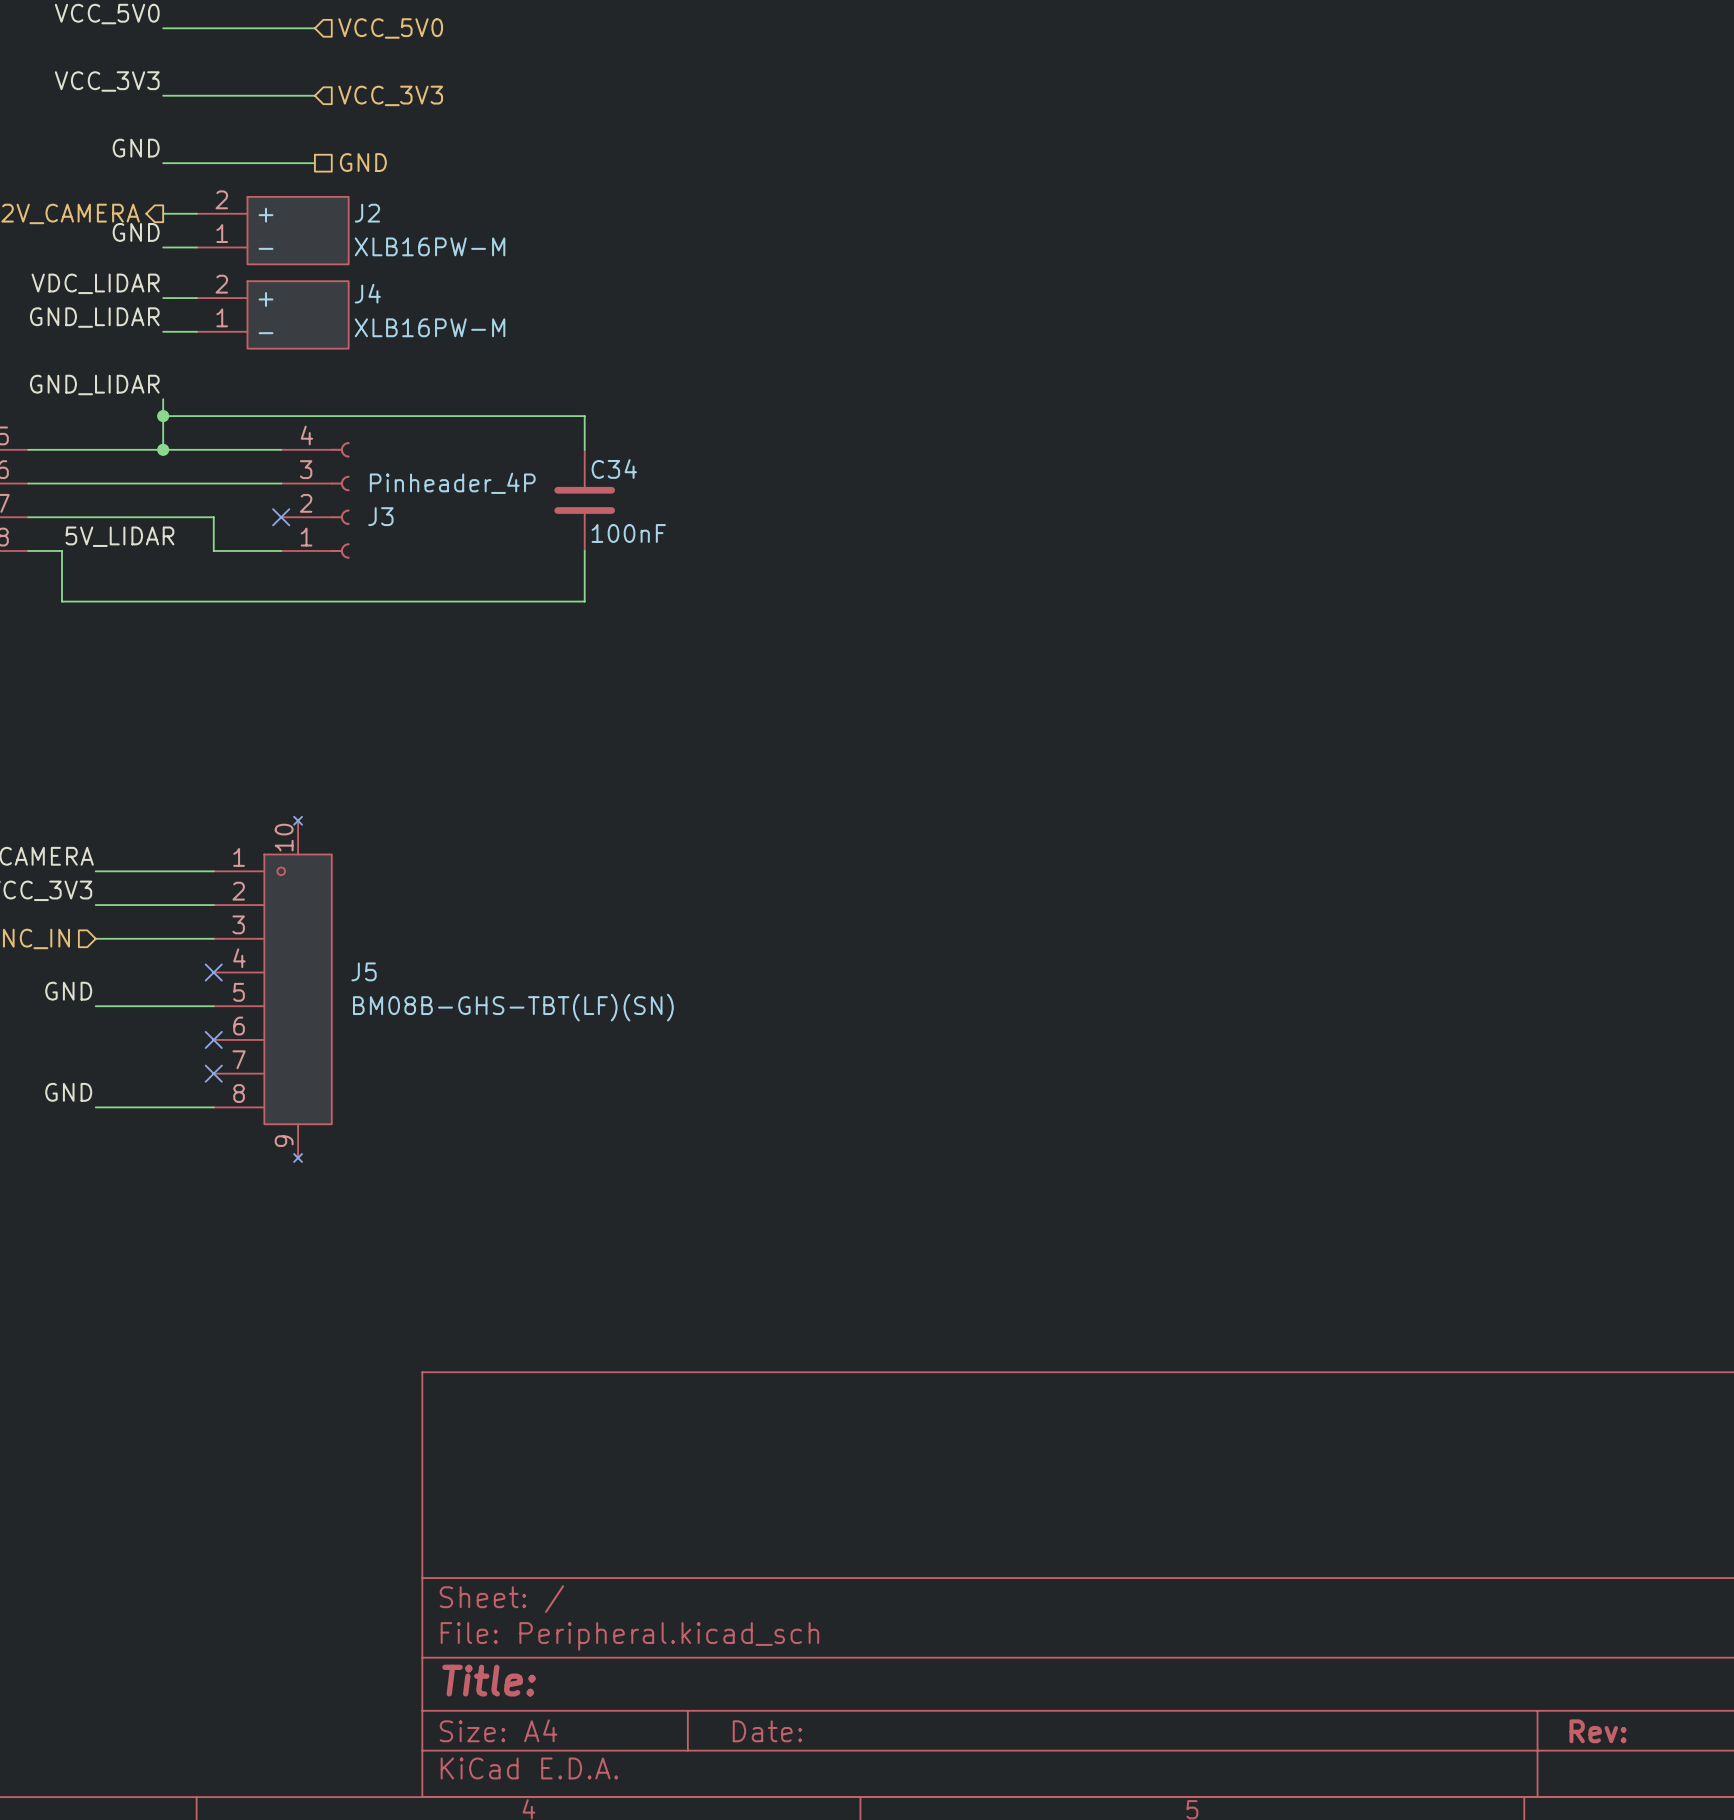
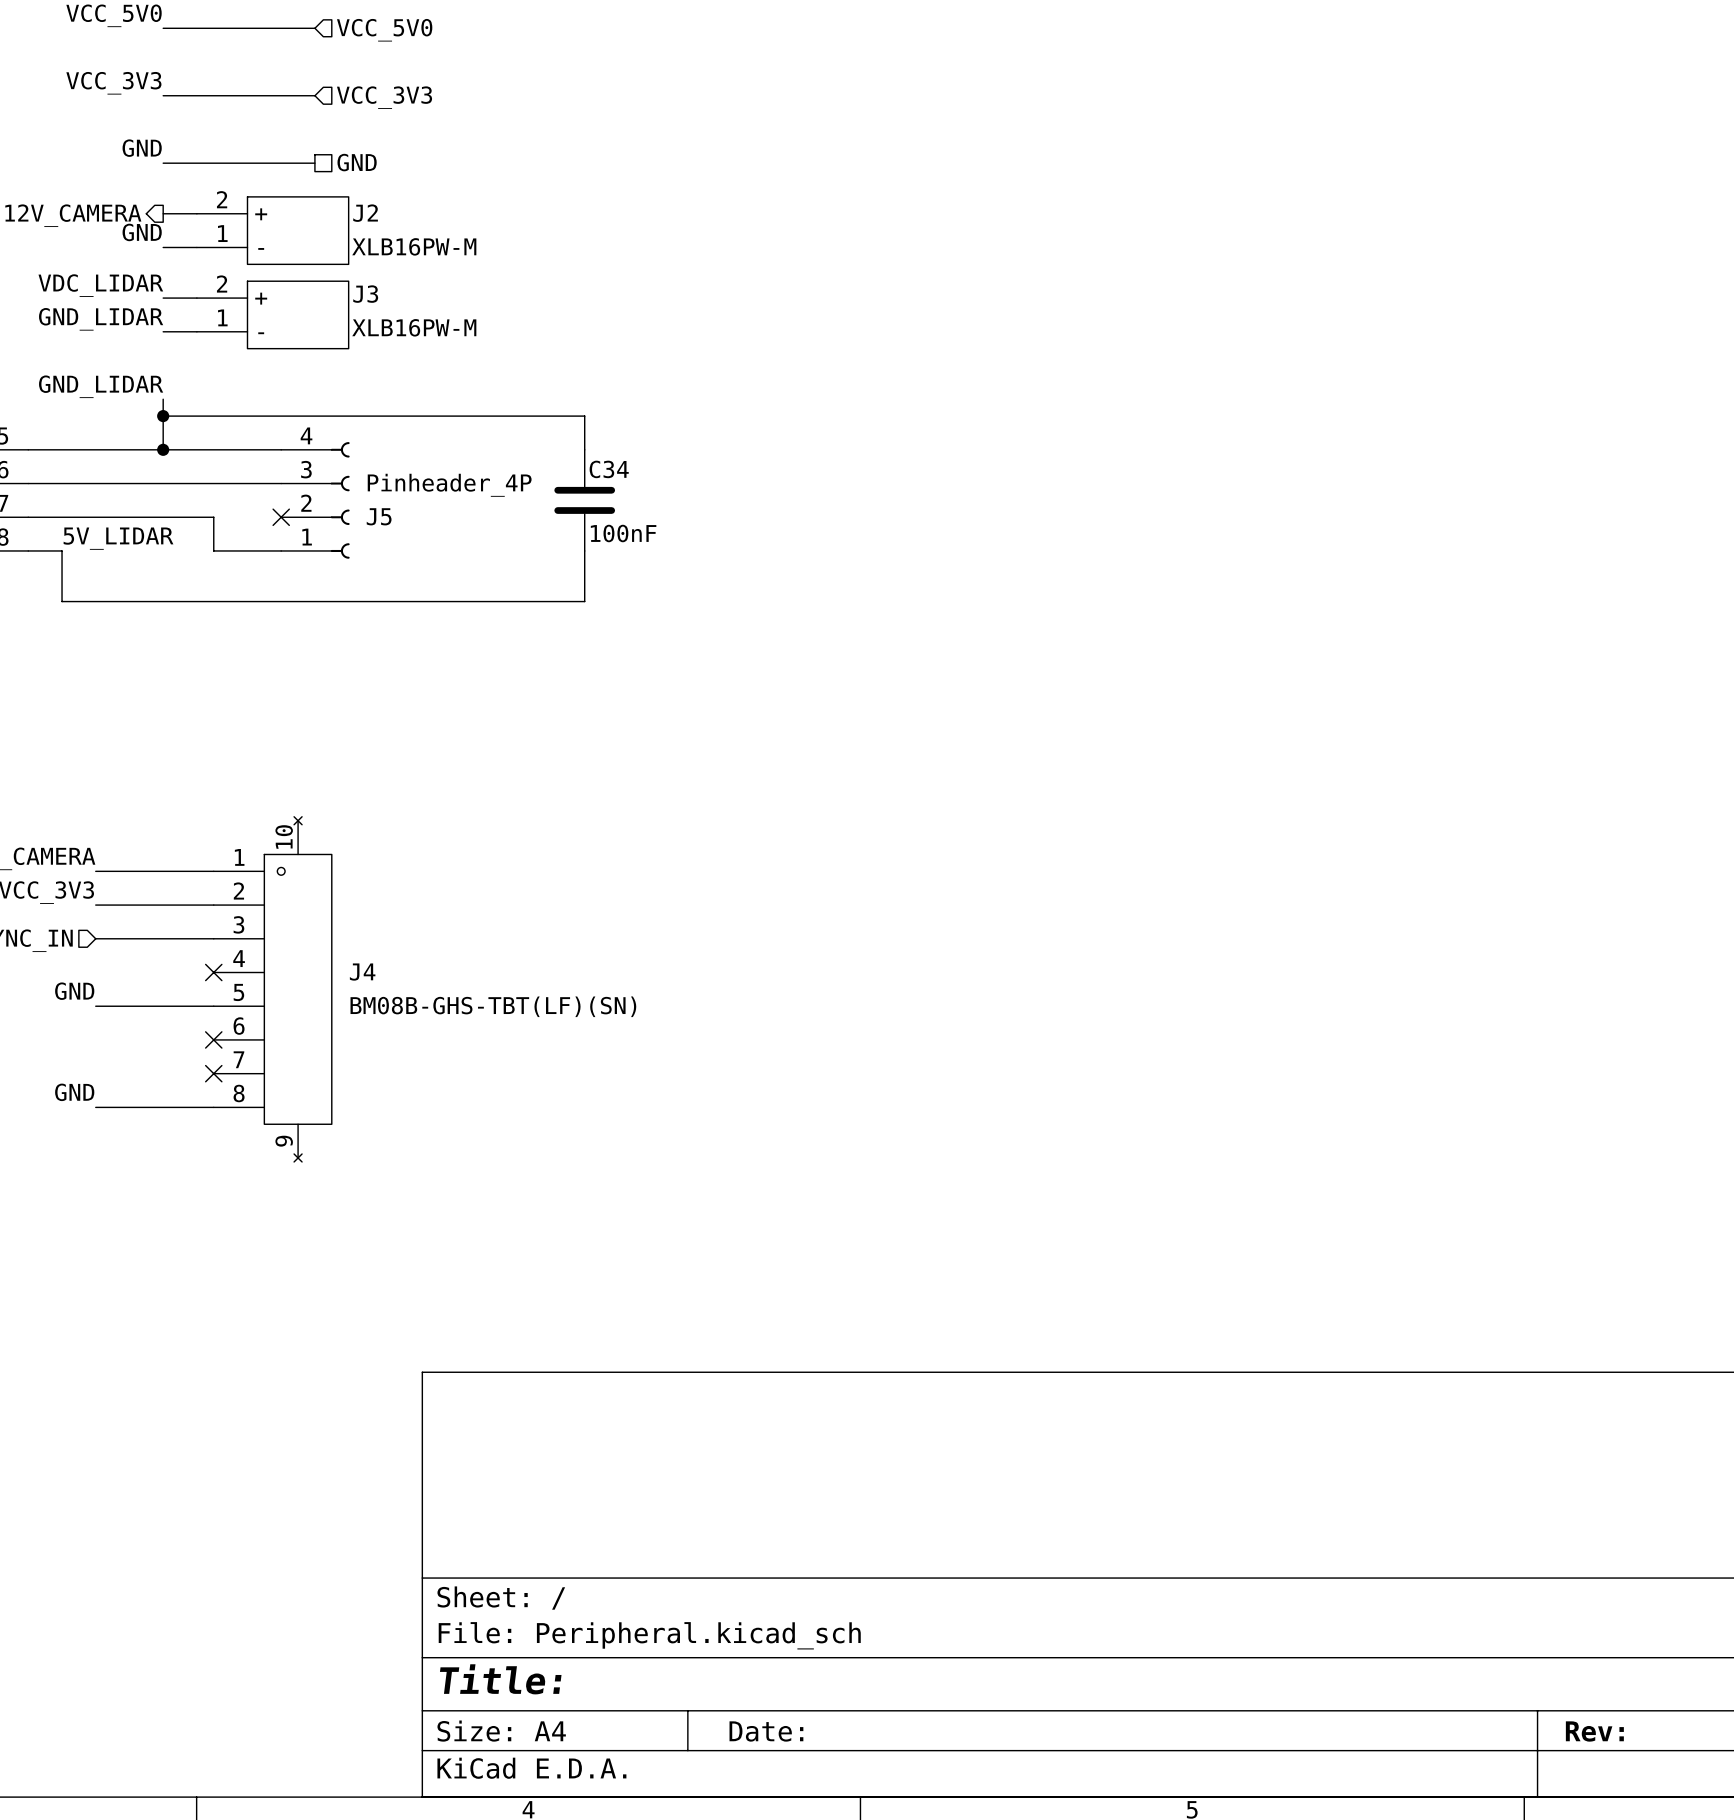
J4 name: J4 (367, 293) -> J3 (365, 294)
J3 name: J3 (380, 516) -> J5 (379, 516)
J5 name: J5 (364, 971) -> J4 (362, 972)

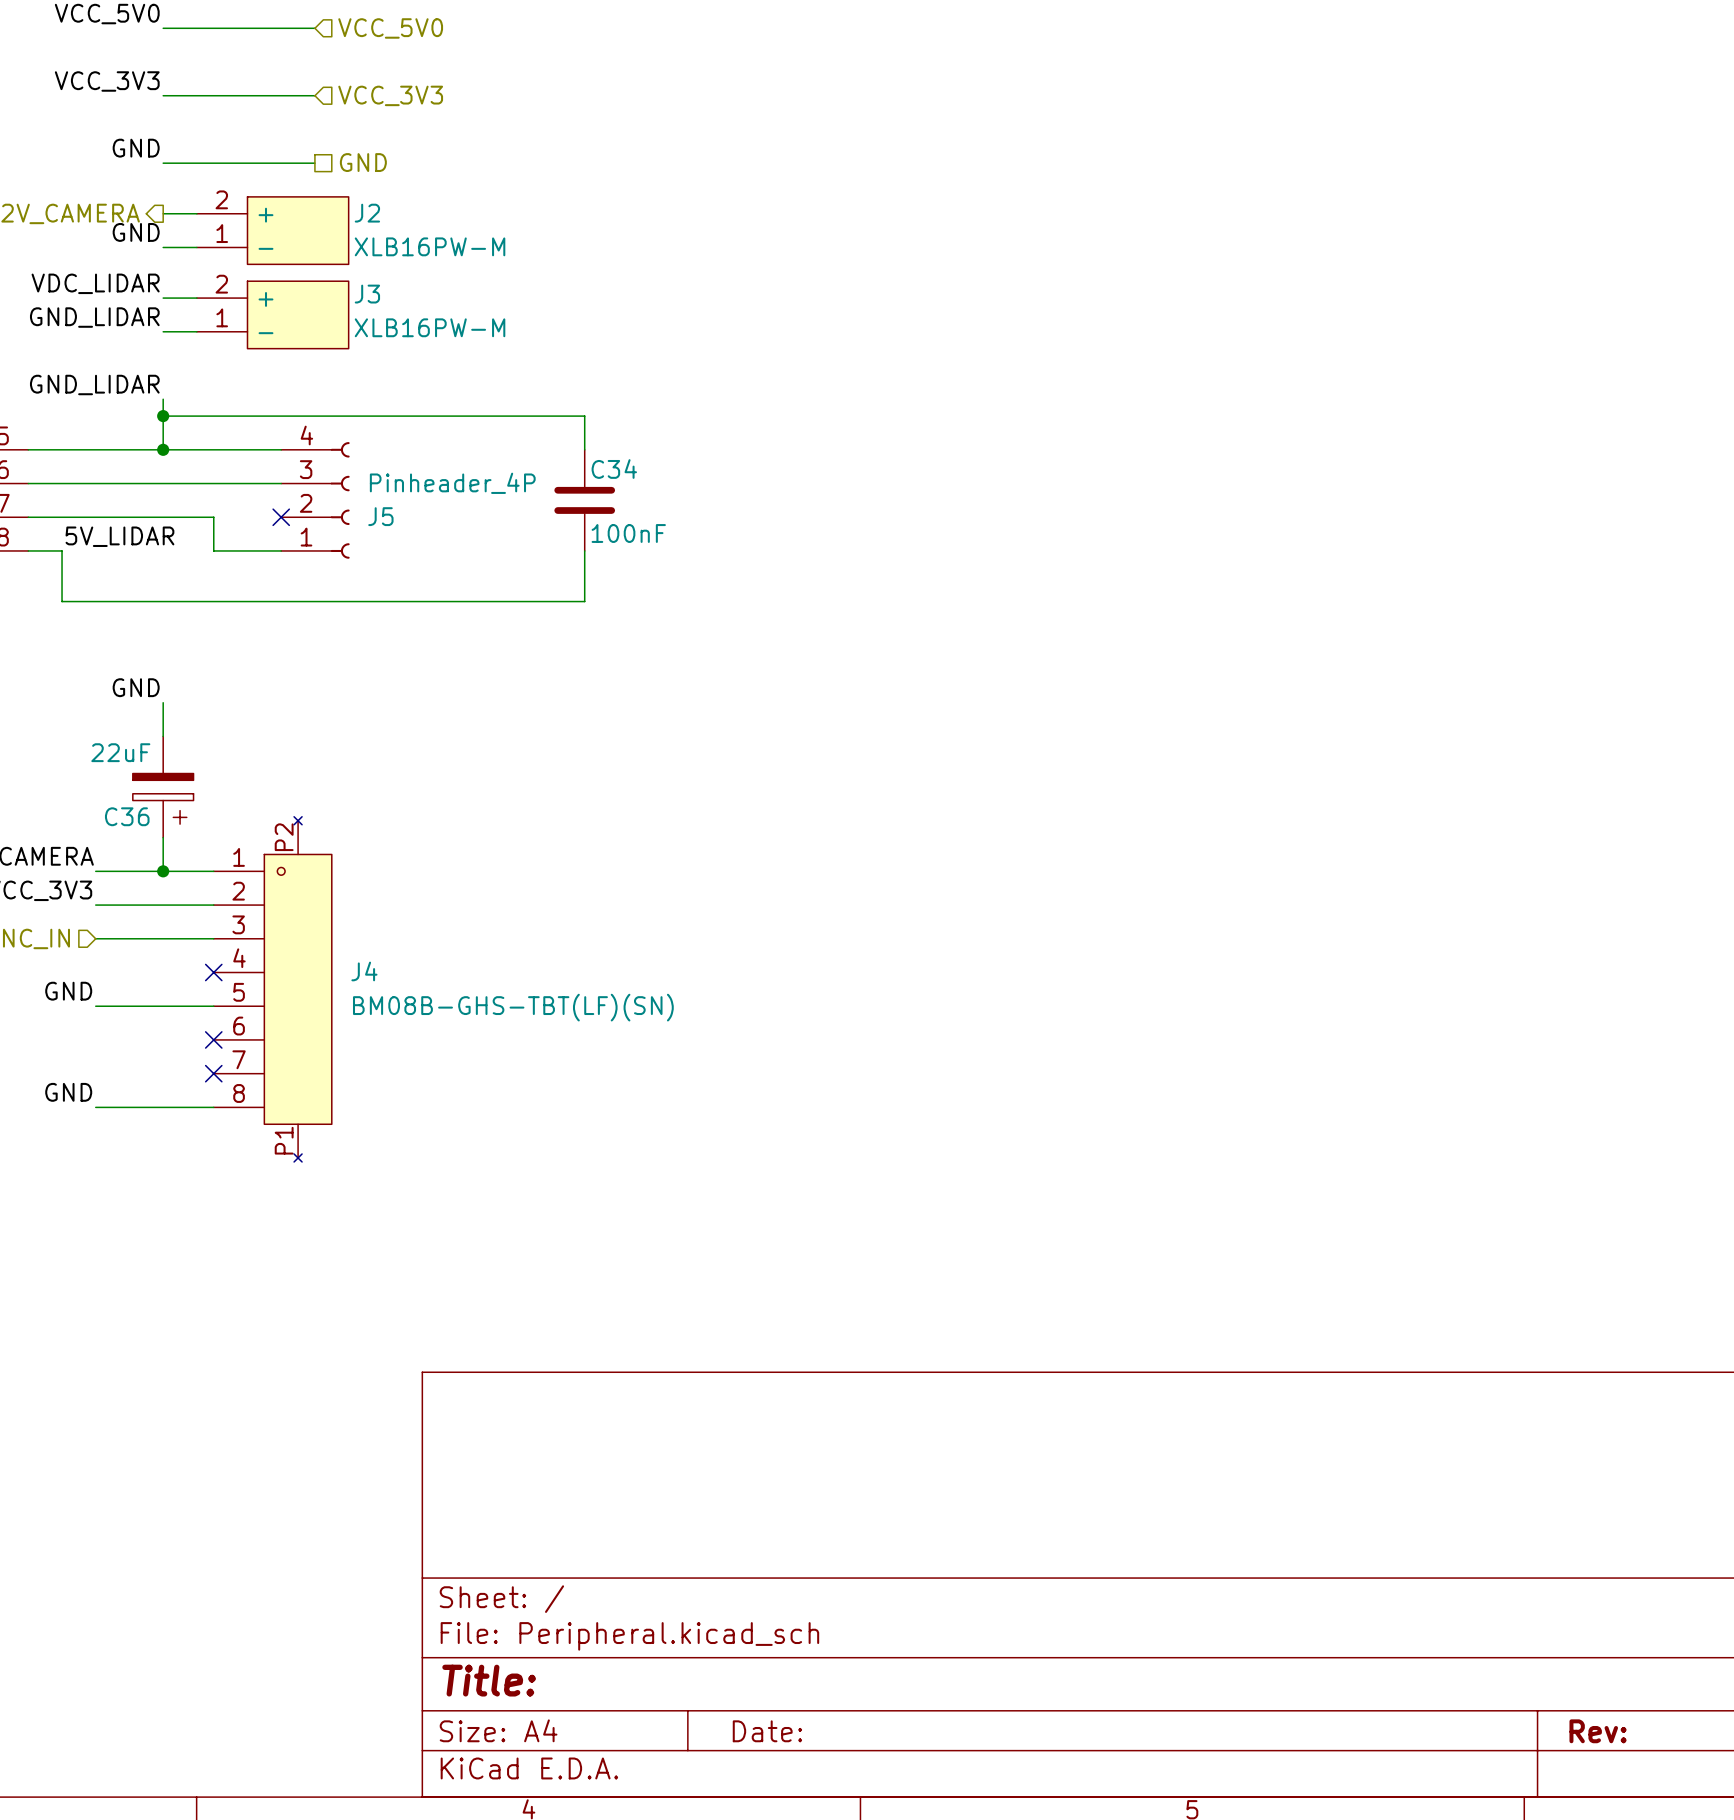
label: none -> GND (136, 687)
wire: none -> (163, 702) (163, 736)
C36: none -> 22uF (163, 787)
J4 pin number: 10 (284, 836) -> P2 (284, 837)
wire: none -> (163, 837) (163, 871)
junction: none -> (163, 871)
J4 pin number: 9 (284, 1141) -> P1 (284, 1140)

